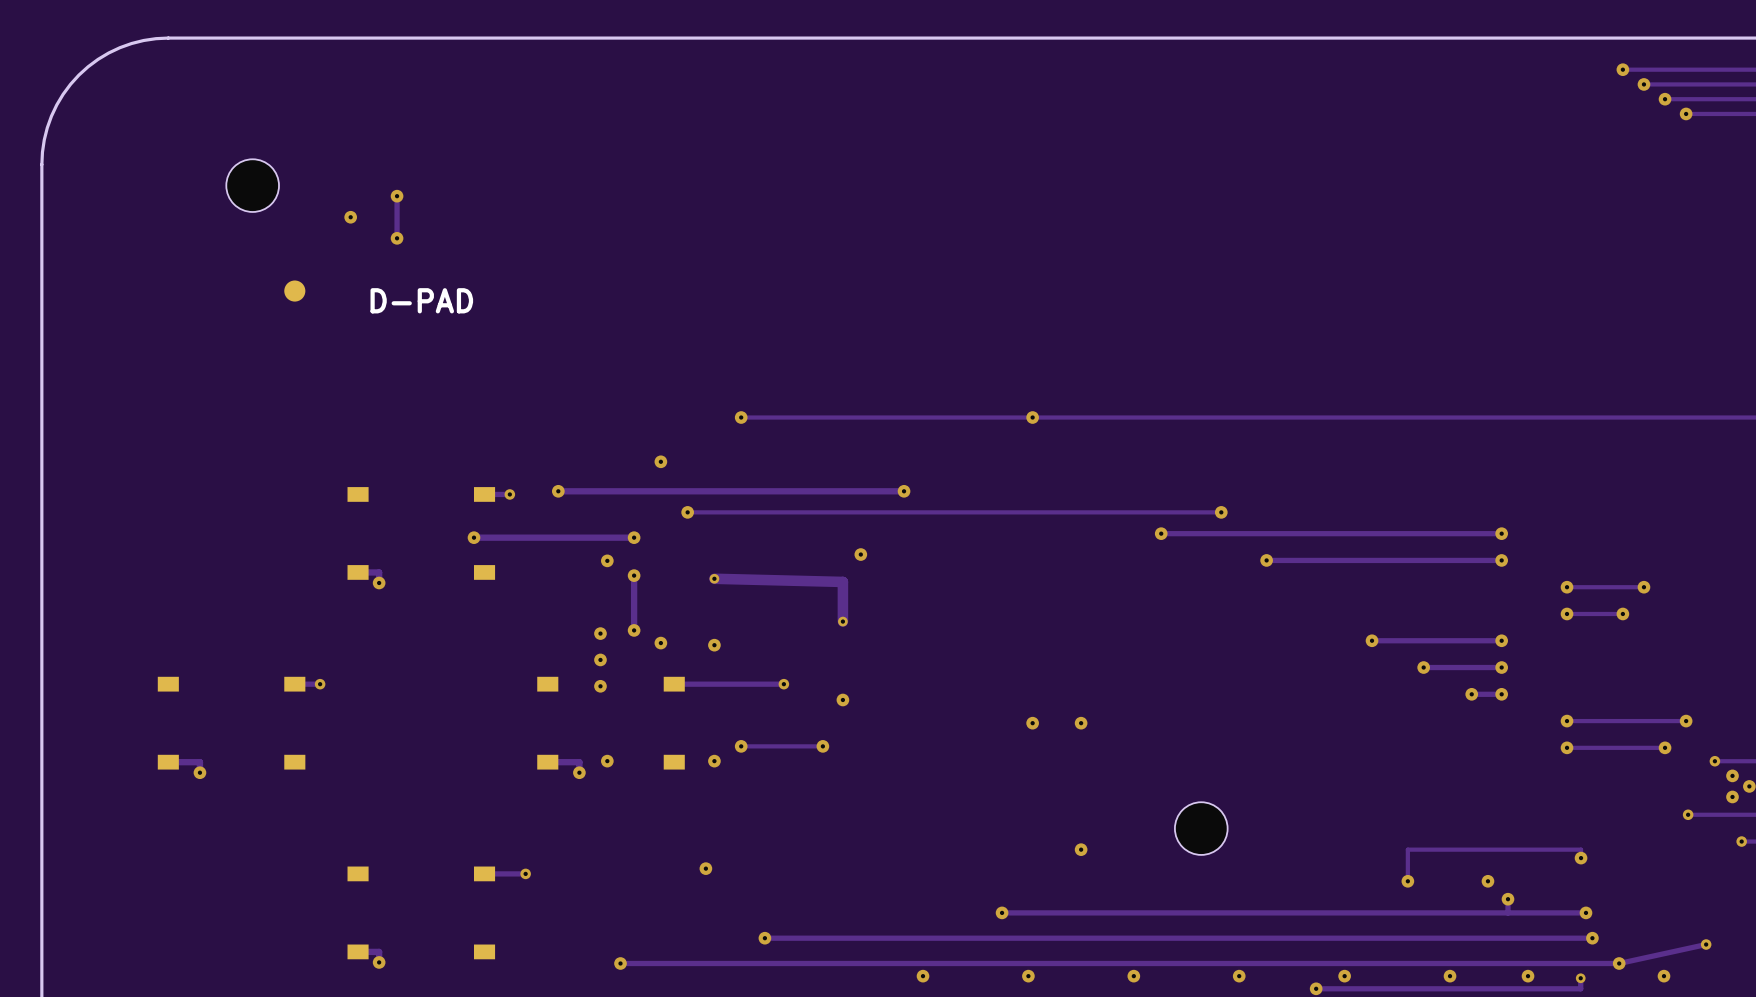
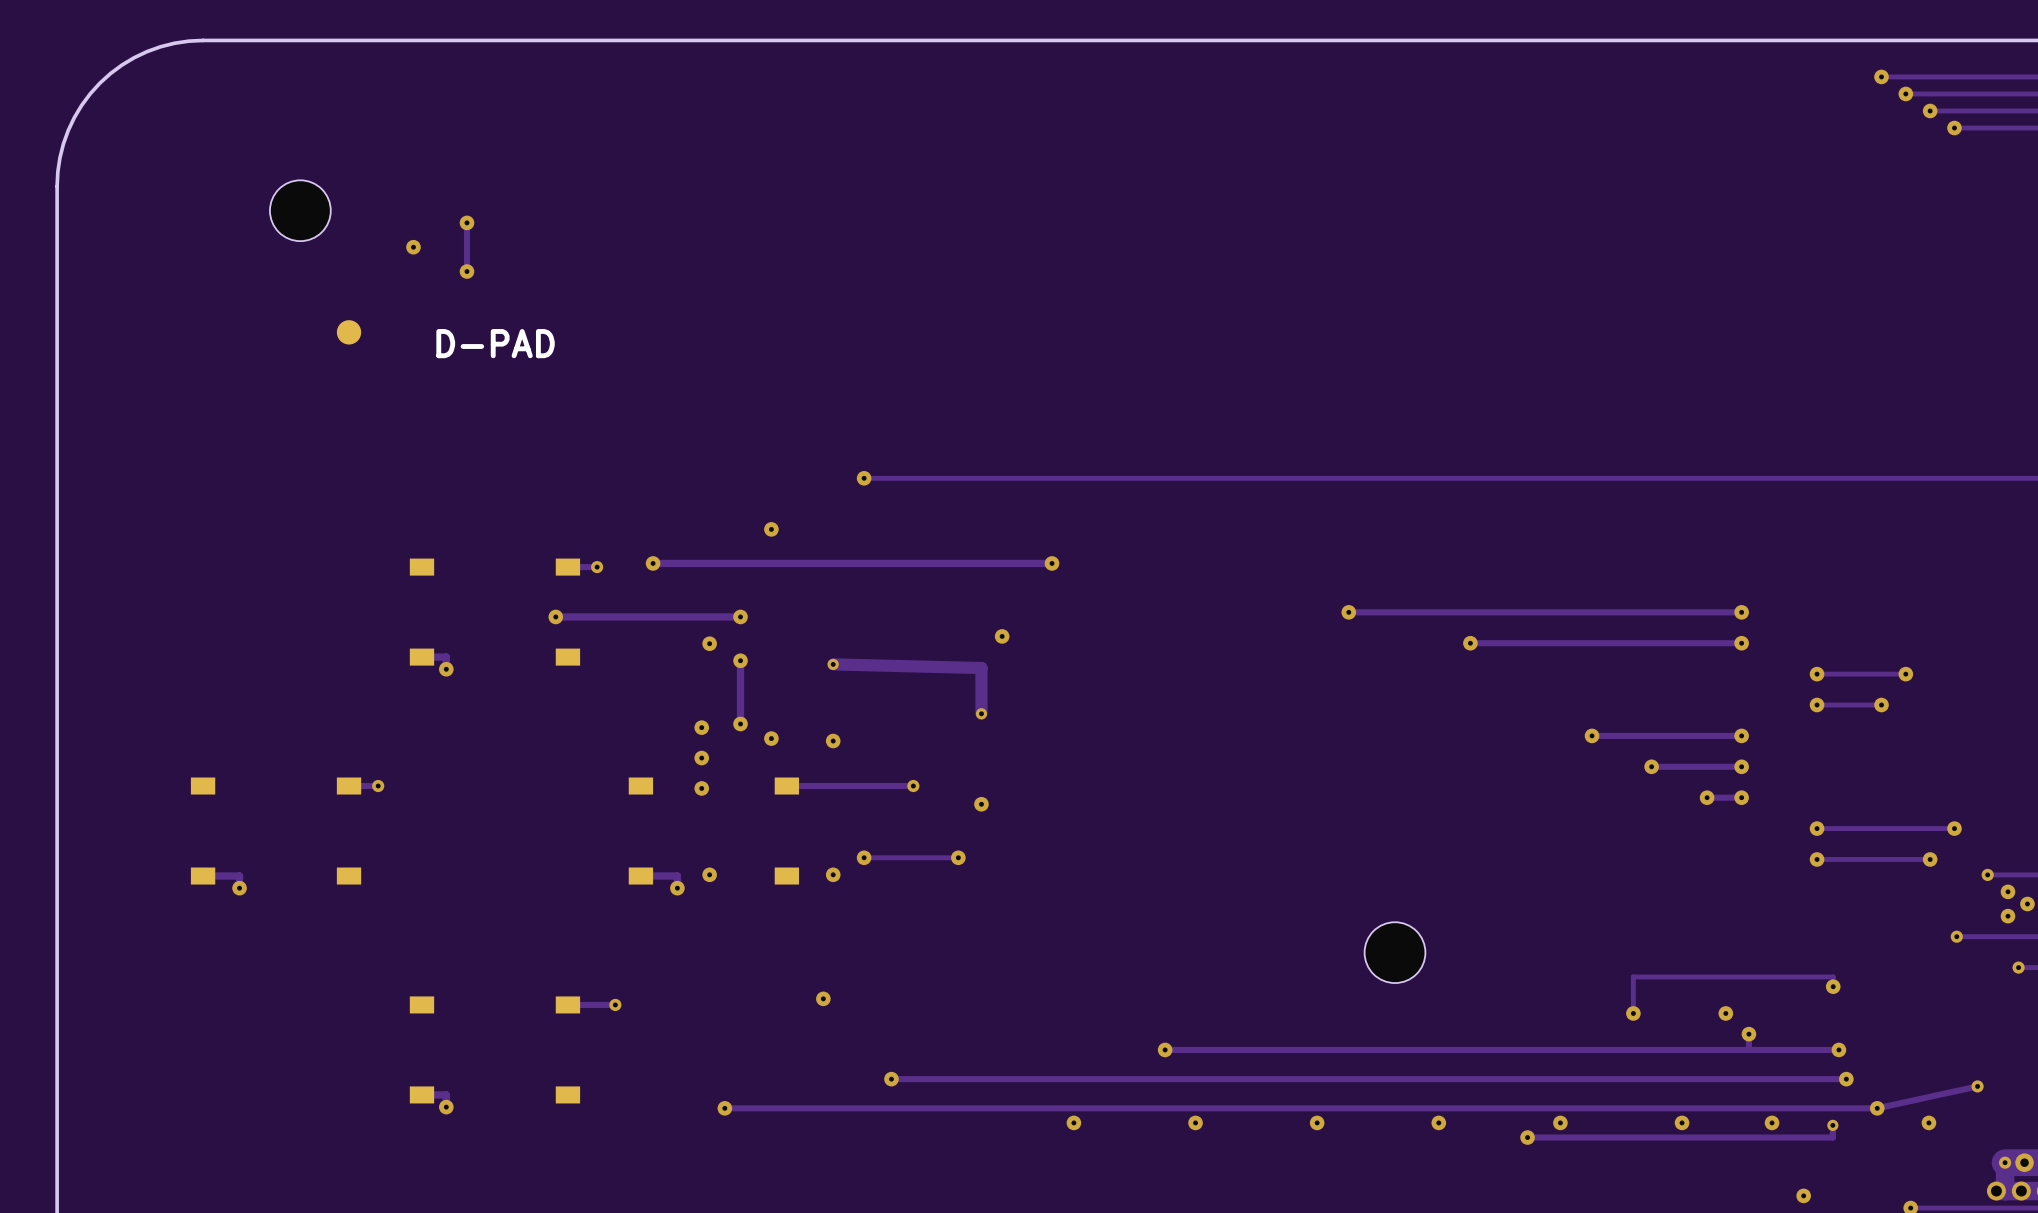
via: (1032, 417) -> none
track: (687, 512) (1221, 512) -> none
via: (687, 512) -> none
via: (1221, 512) -> none
via: (1032, 723) -> none
via: (1081, 723) -> none
via: (1081, 849) -> none

